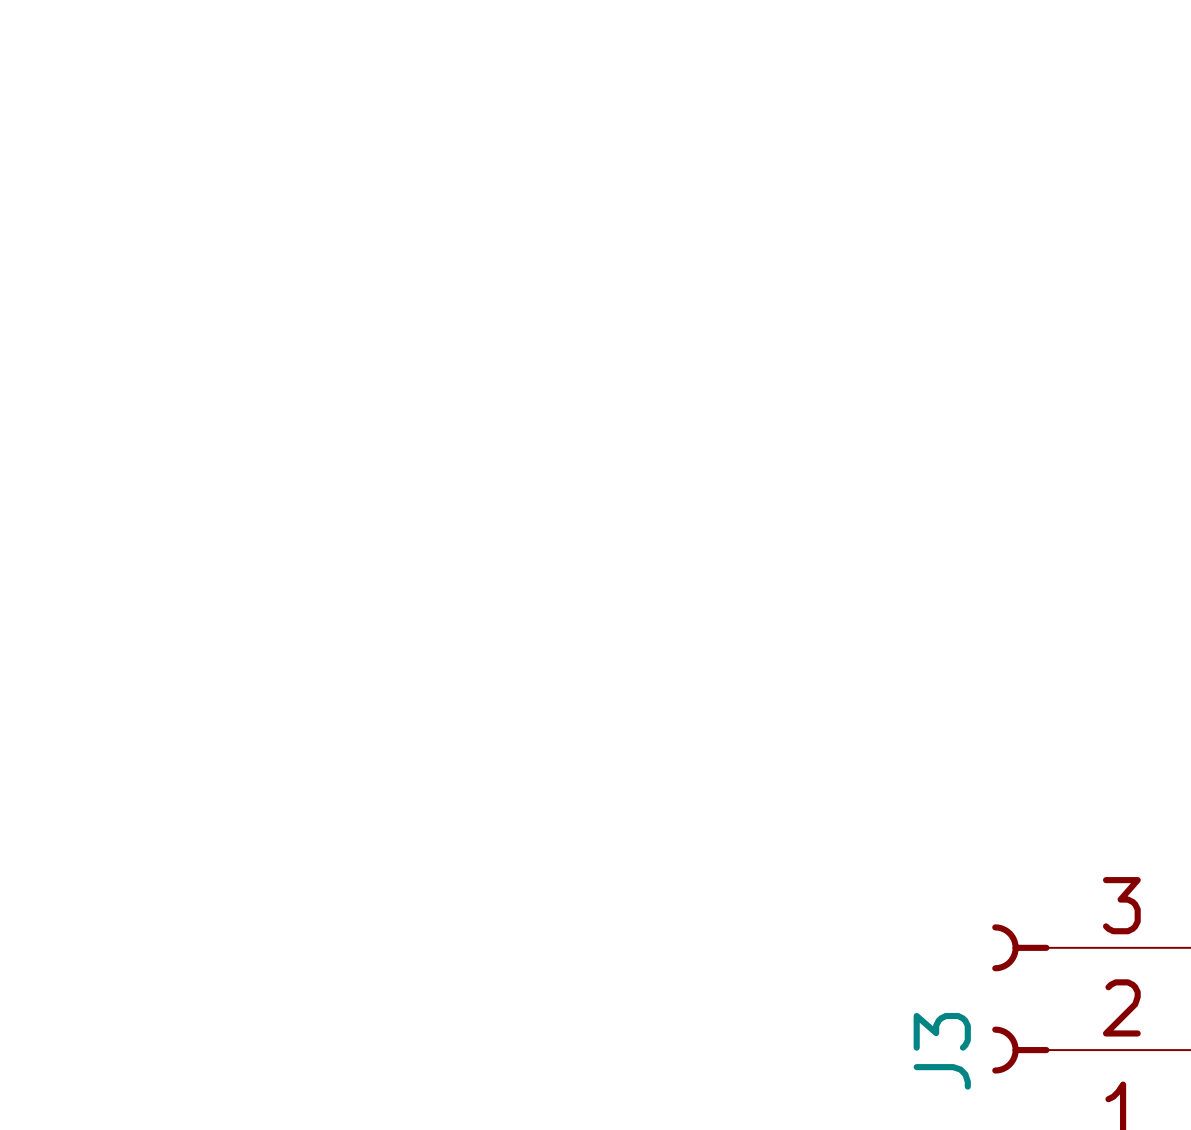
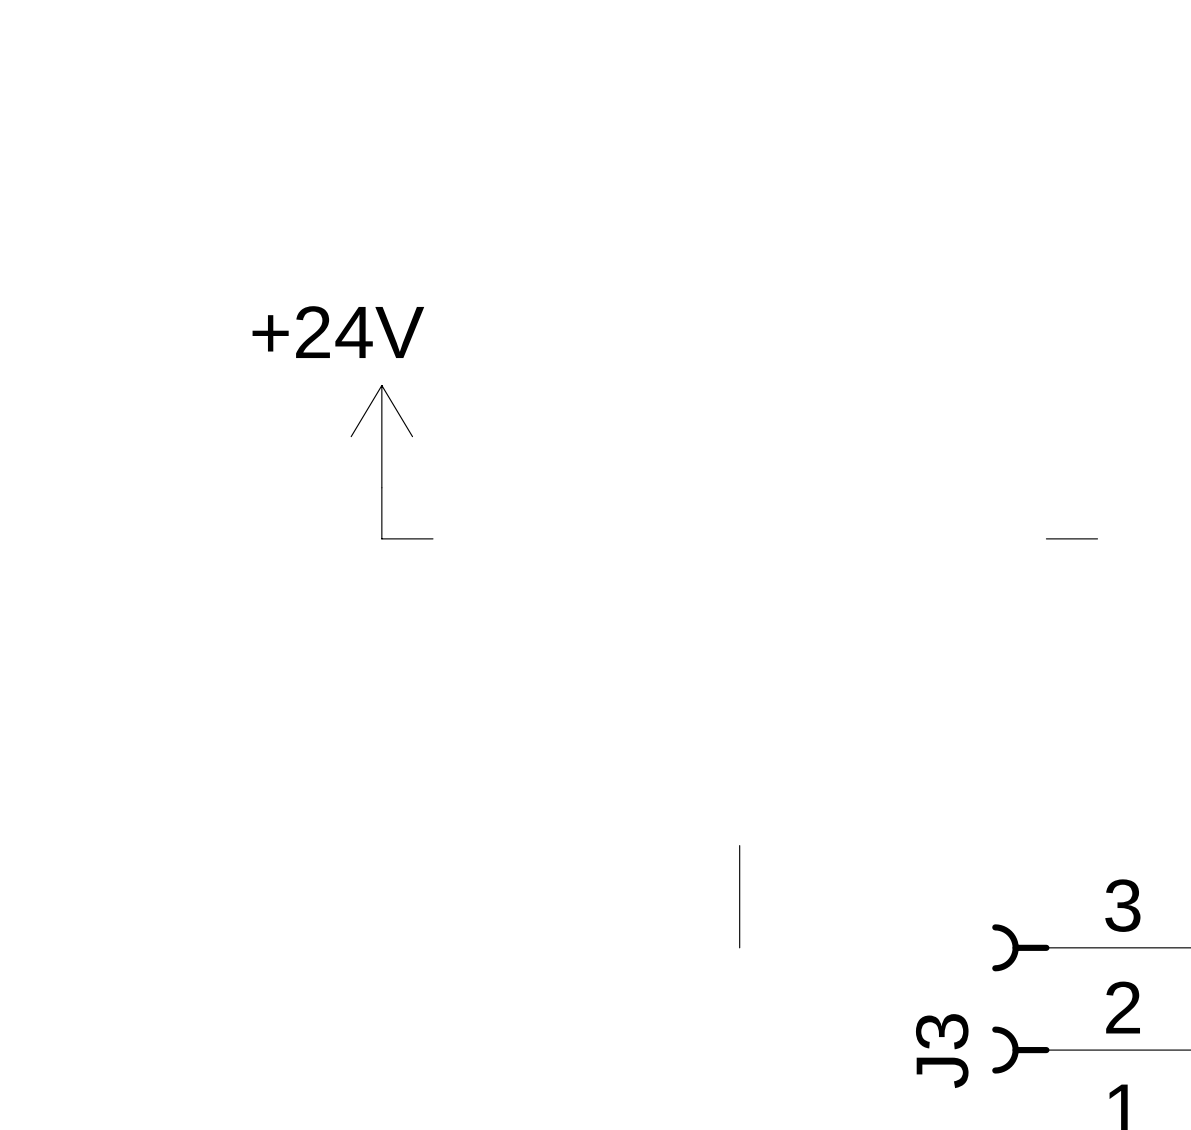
power symbol: none -> +24V (381, 436)
wire: none -> (381, 487) (381, 538) (432, 538)
wire: none -> (1046, 538) (1097, 538)
wire: none -> (739, 845) (739, 947)

